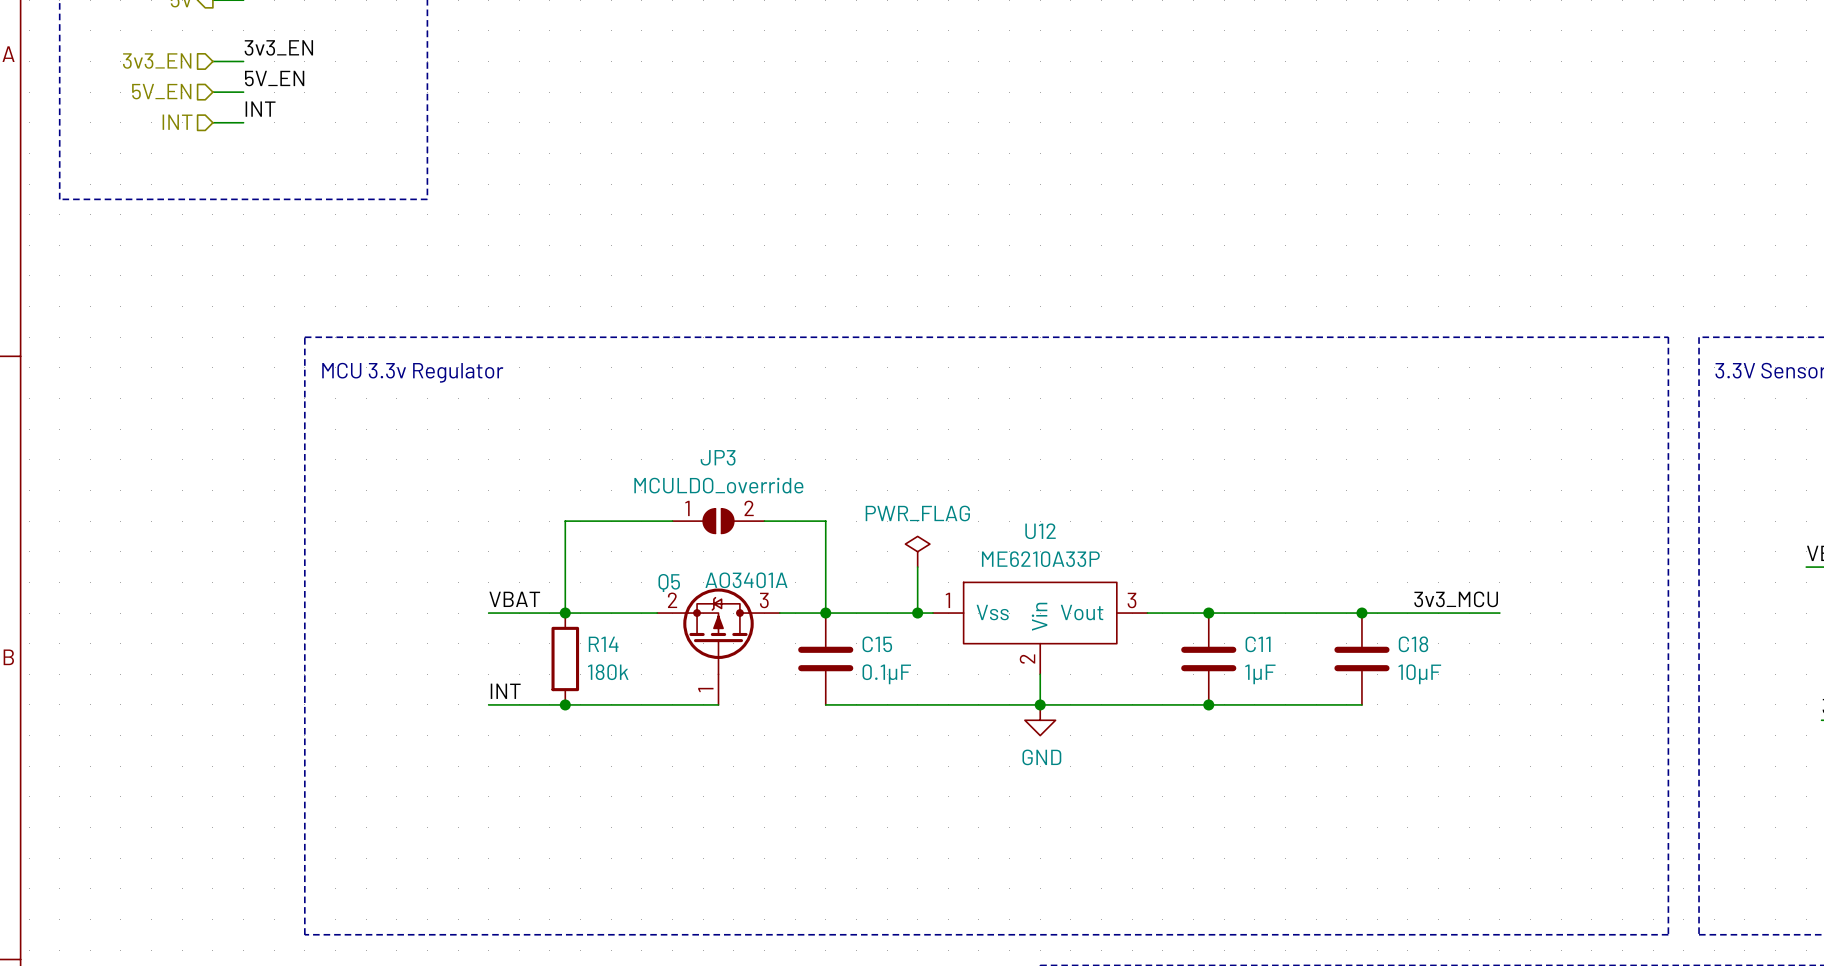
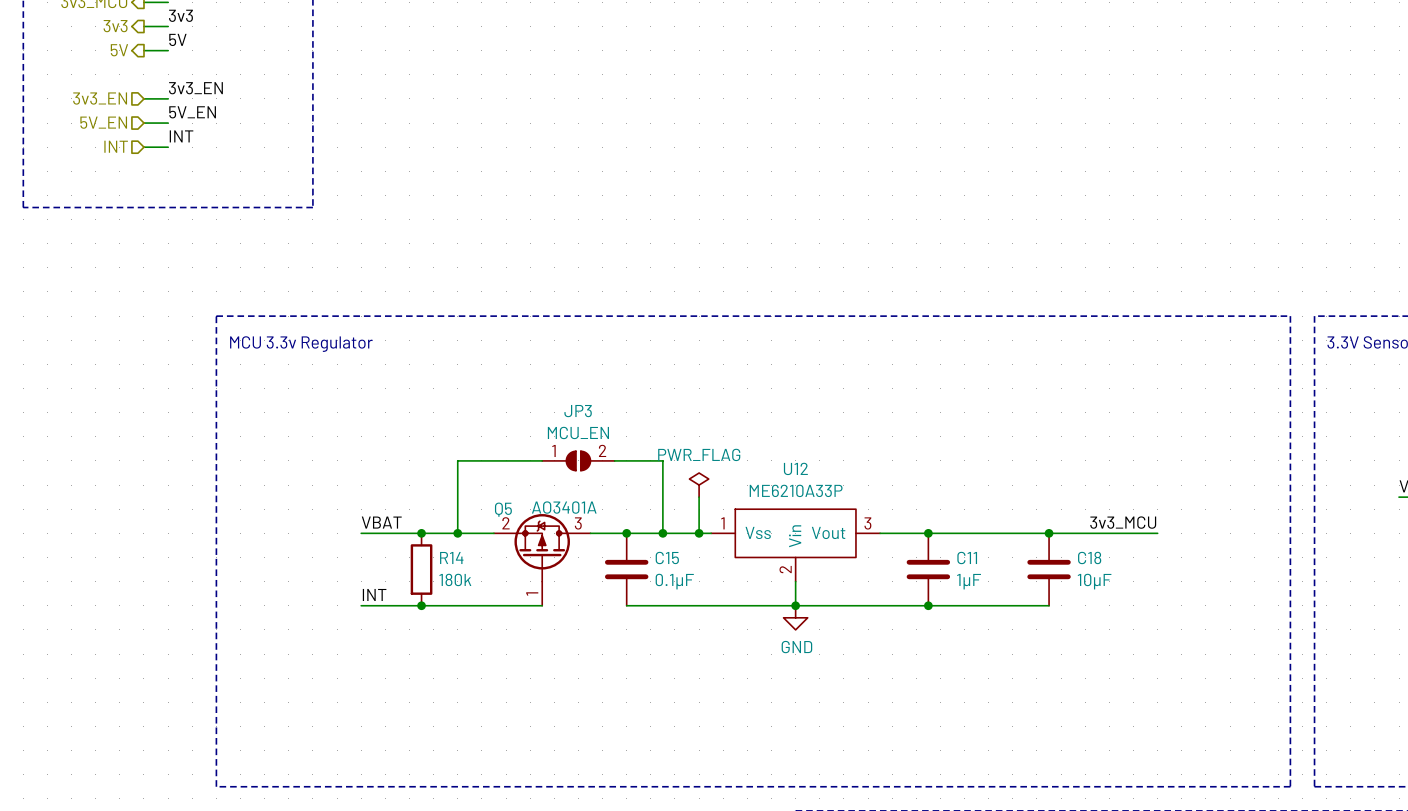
JP3 value: MCULDO_override (718, 485) -> MCU_EN (578, 432)
wire: (611, 521) (565, 521) (565, 613) -> (457, 460) (457, 533)
JP3 position: (718, 521) -> (578, 460)
wire: (825, 521) (825, 613) -> (626, 460) (662, 460) (662, 533)
junction: none -> (457, 533)
junction: none -> (662, 533)

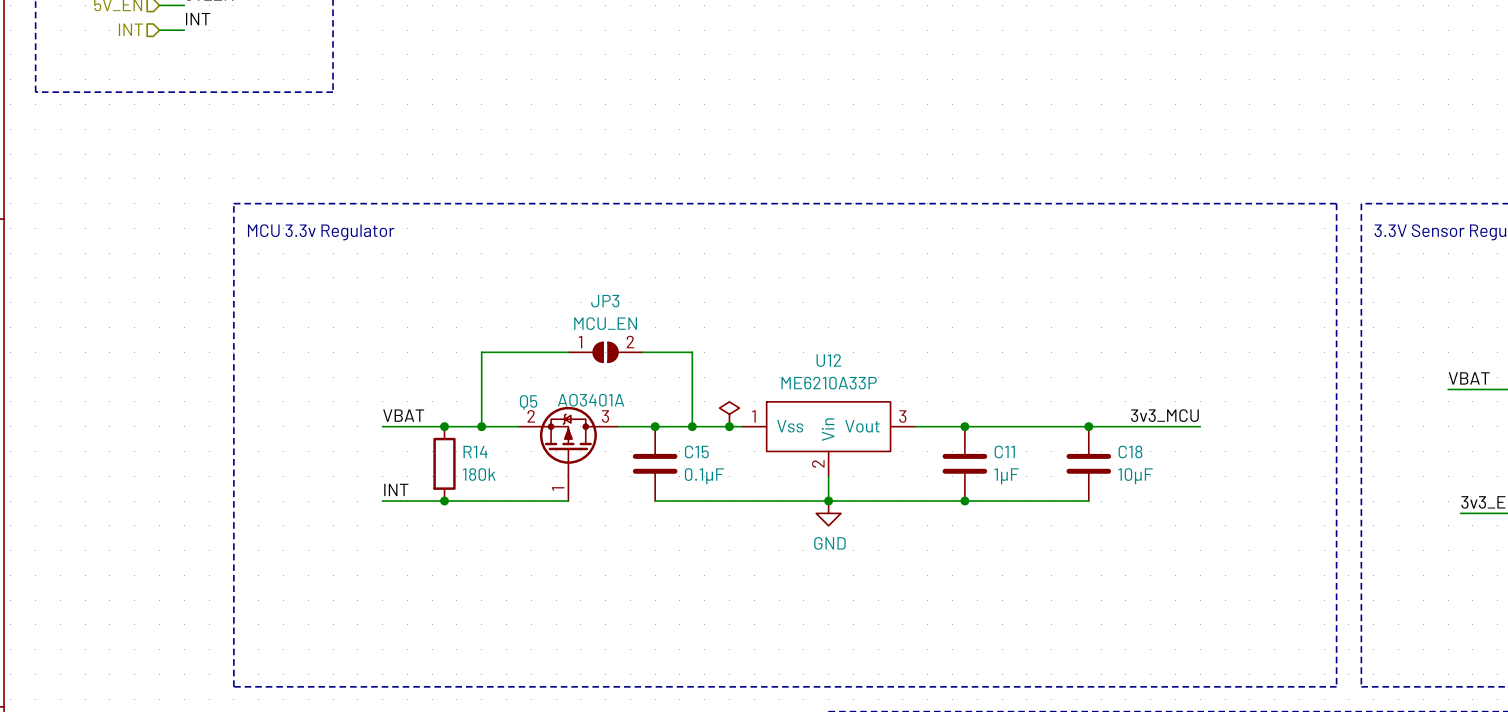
power symbol: PWR_FLAG (699, 485) -> none
wire: (699, 497) (699, 533) -> none
power symbol: none -> (729, 414)

